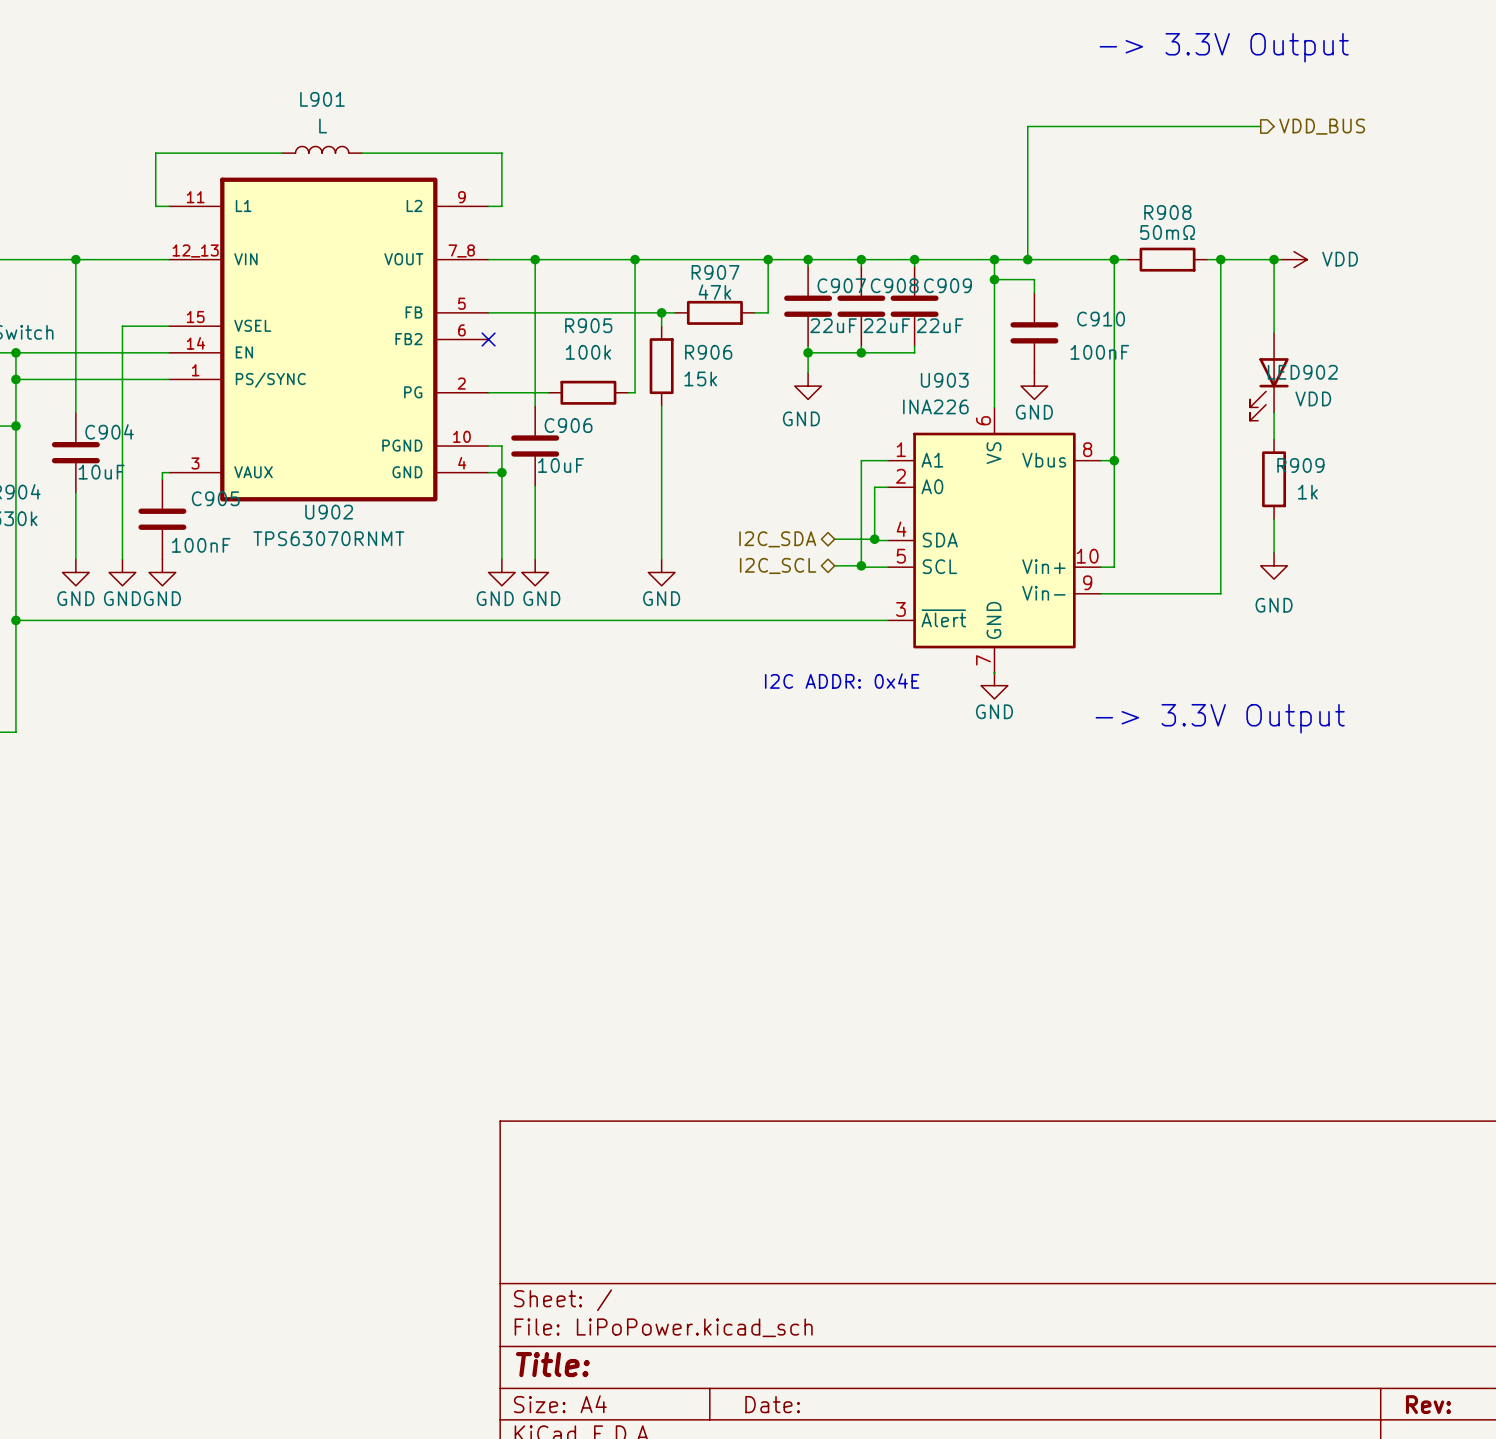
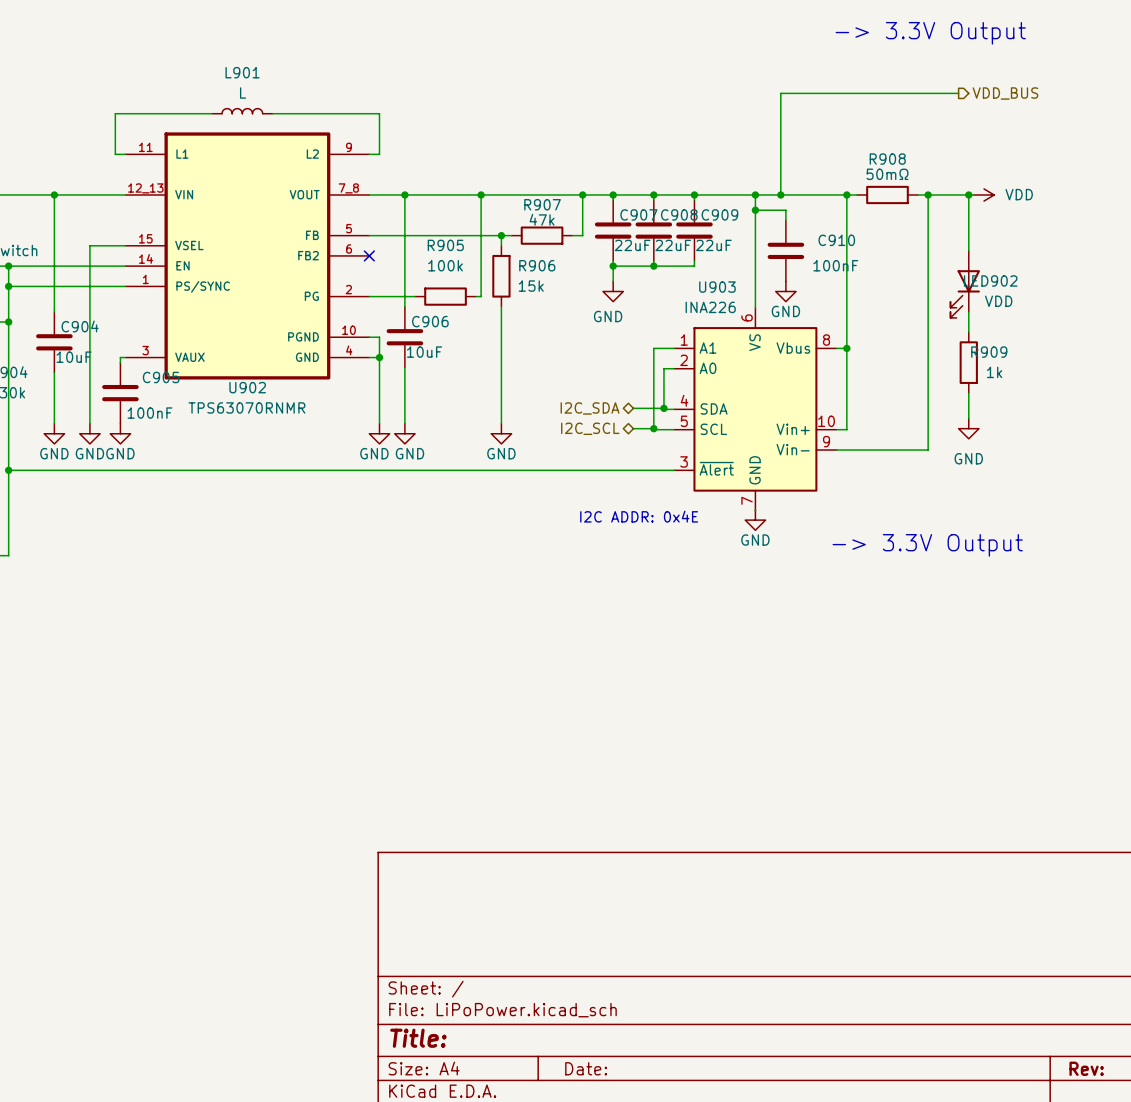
U902 value: TPS63070RNMT (328, 538) -> TPS63070RNMR (246, 407)

